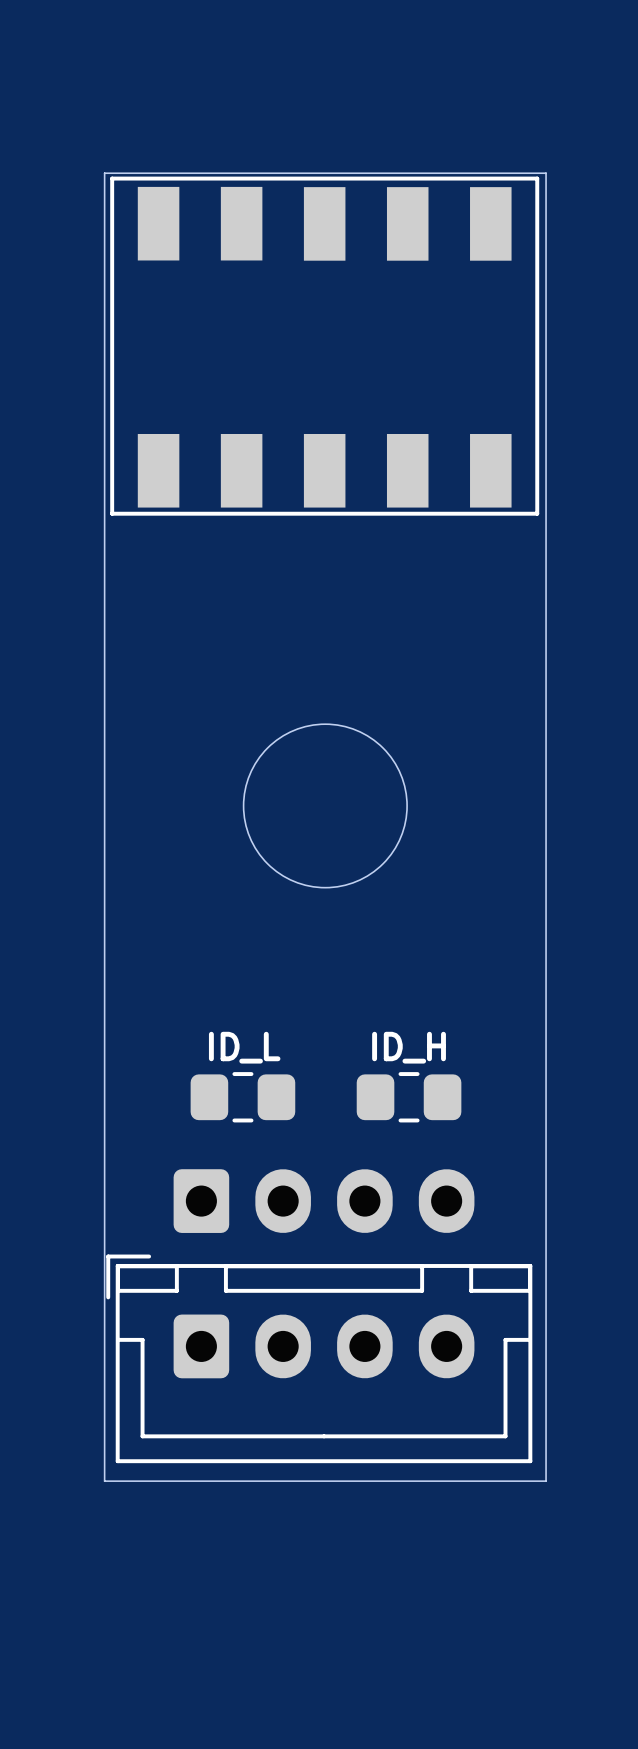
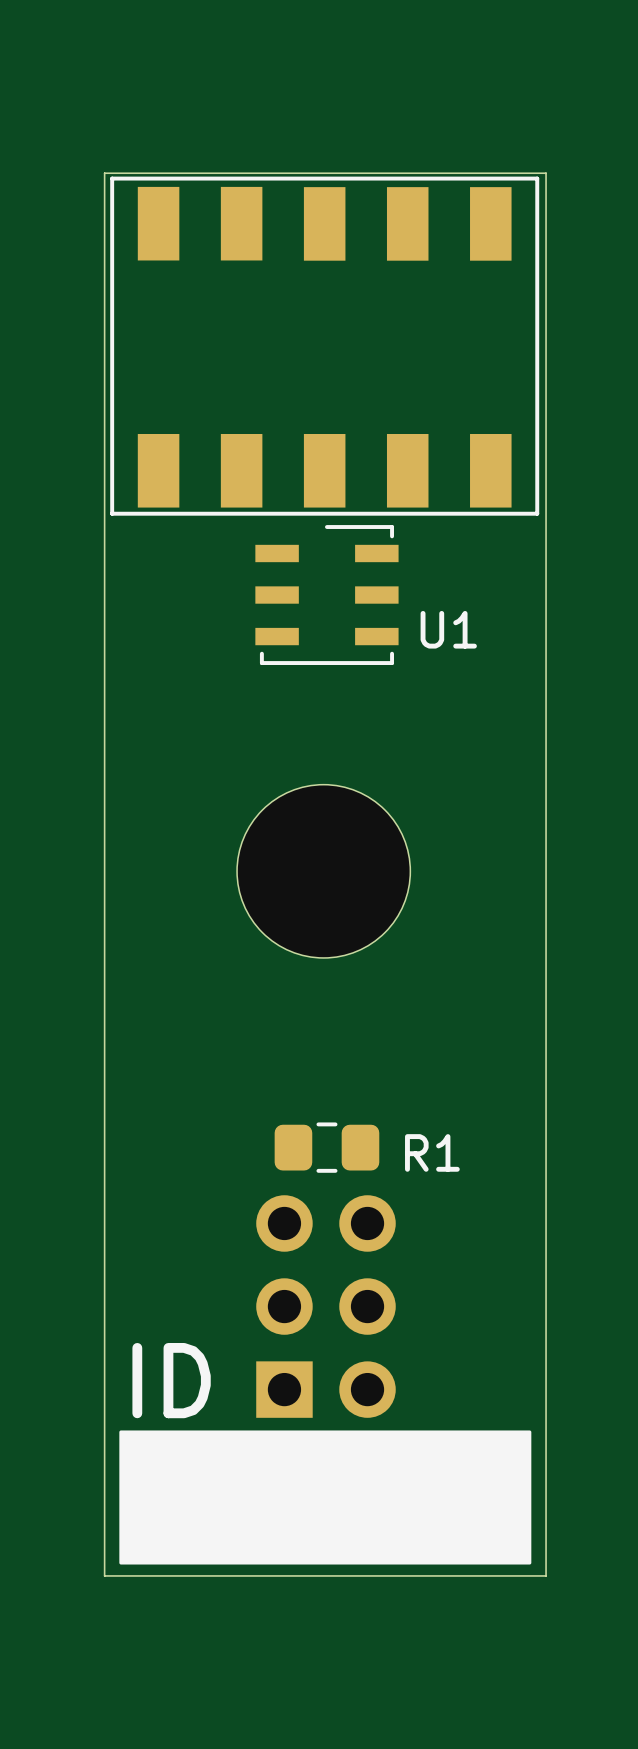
U1: none -> (326, 595)
round board edge: [242, 723, 408, 889] -> none
part: none -> (323, 871)
text: ID_L (244, 1047) -> none
text: ID_H (409, 1047) -> none
part: (242, 1097) -> none
part: (409, 1097) -> none
R1: none -> (326, 1147)
part: (324, 1201) -> none
part: none -> (325, 1306)
part: (319, 1358) -> none
text: none -> ID (171, 1380)
drawing: none -> [119, 1430, 532, 1565]
board edge: (104, 1481) (546, 1481) -> (104, 1481) (104, 1575) (546, 1575) (546, 1481)

